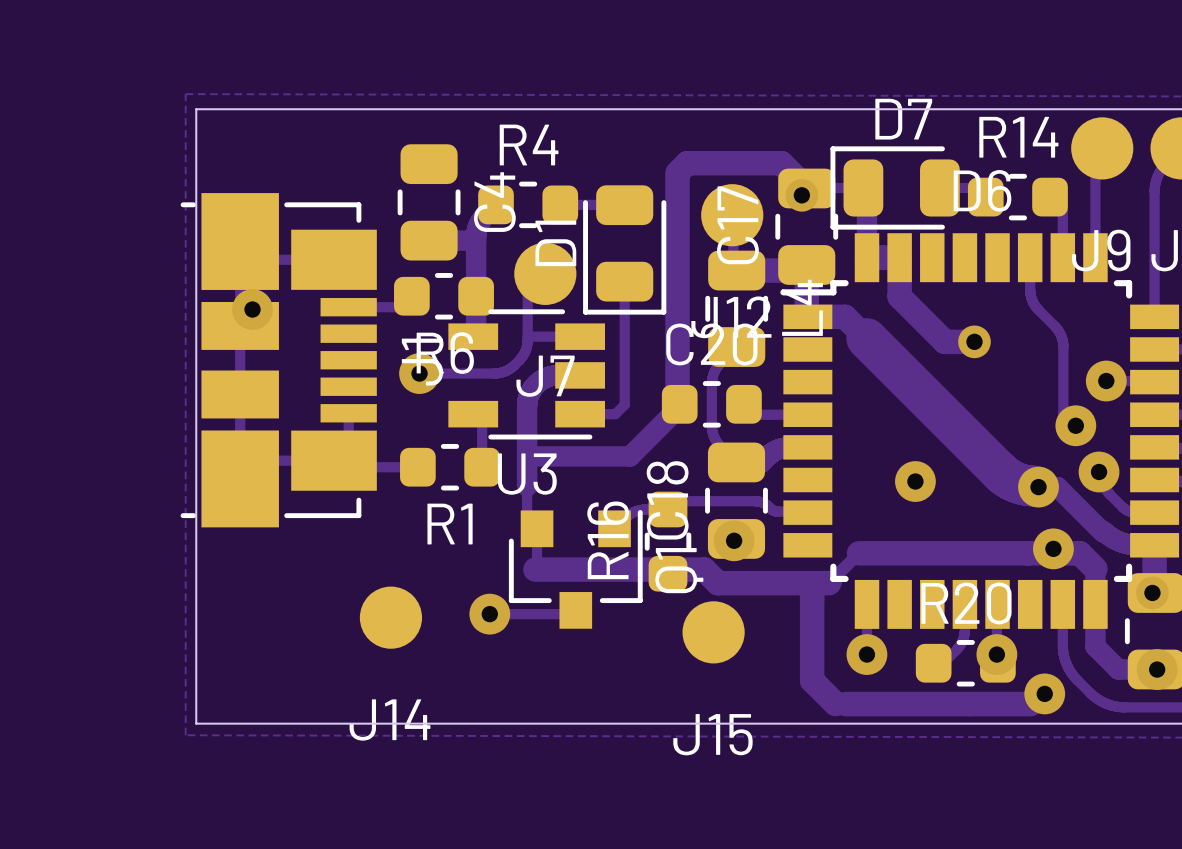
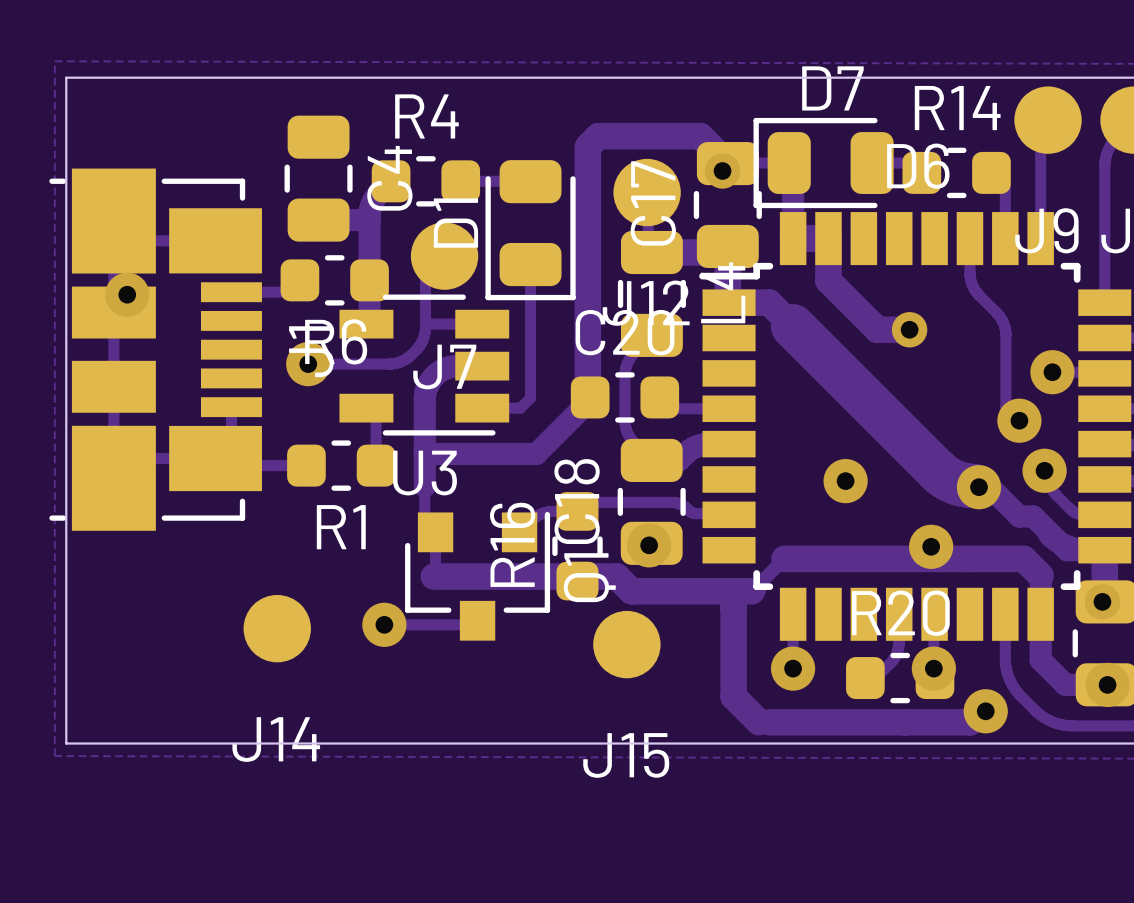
track: (1049, 487) (1057, 487) (1105, 532) -> (990, 487) (1019, 516) (1033, 516) (1067, 550) (1086, 550)
via position: (1053, 548) -> (931, 546)

